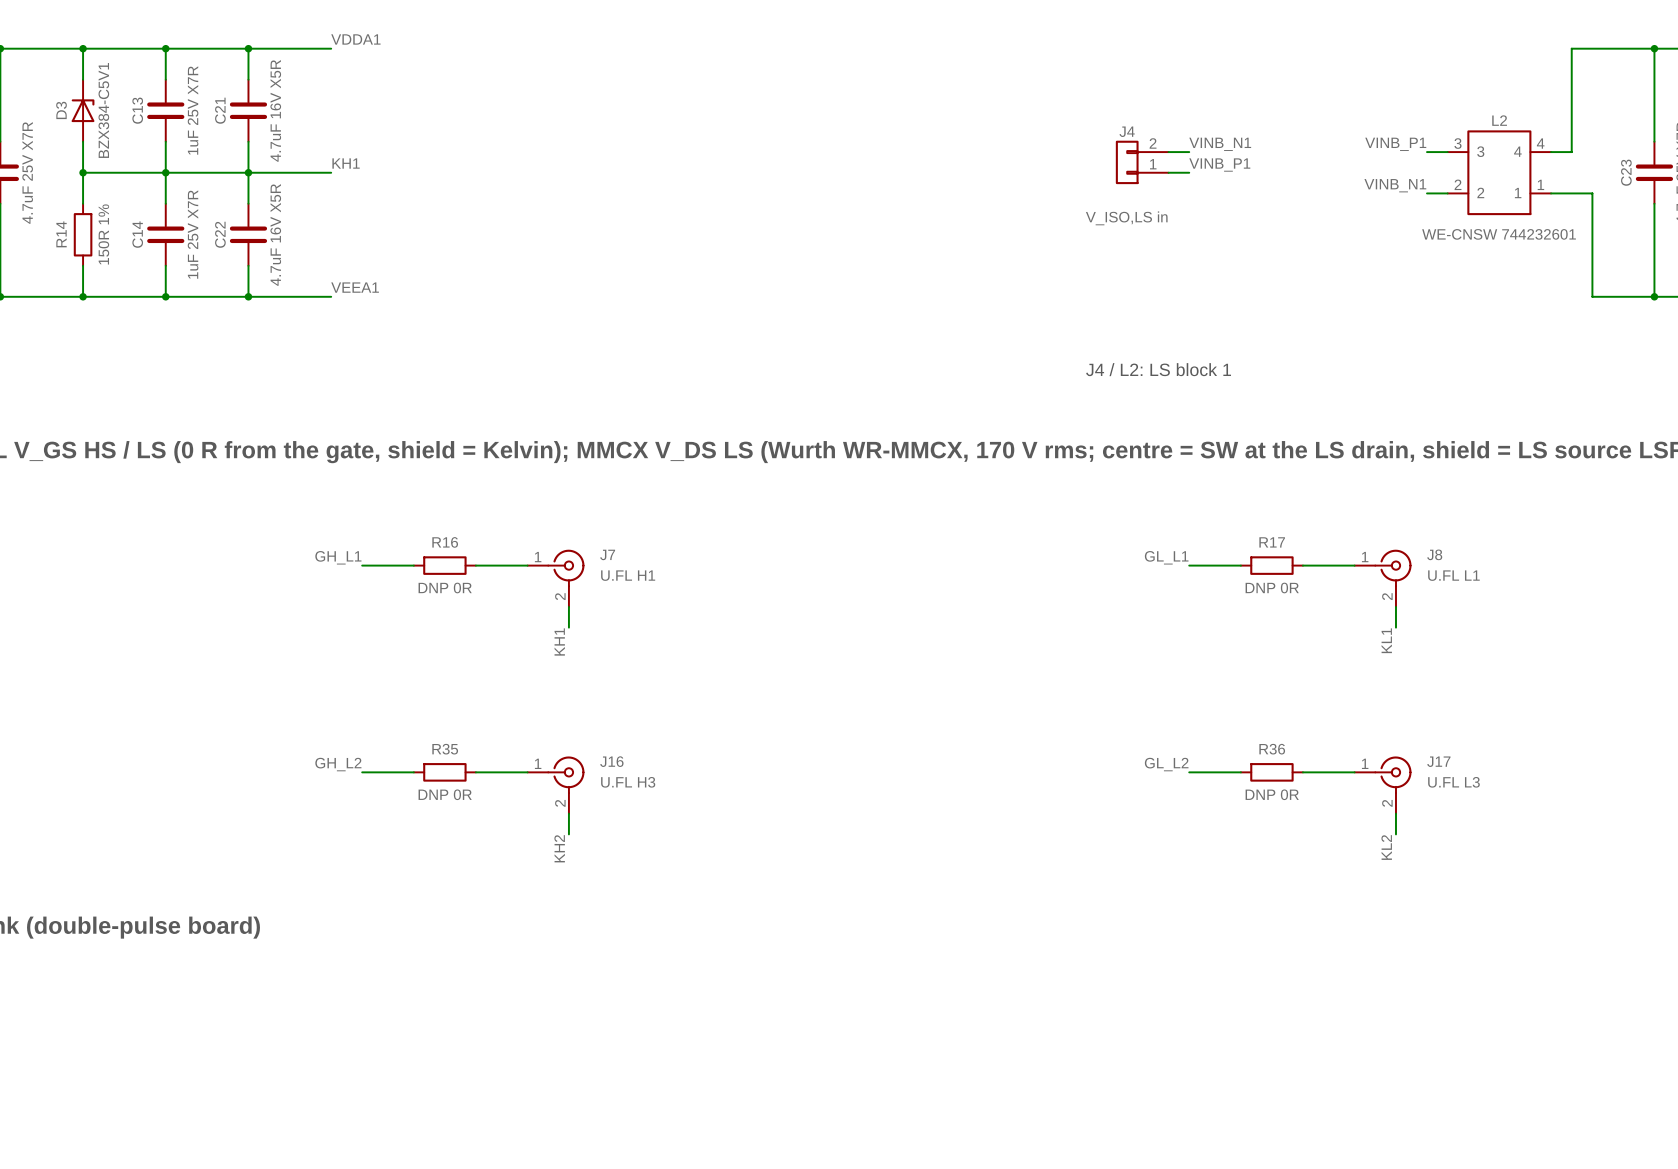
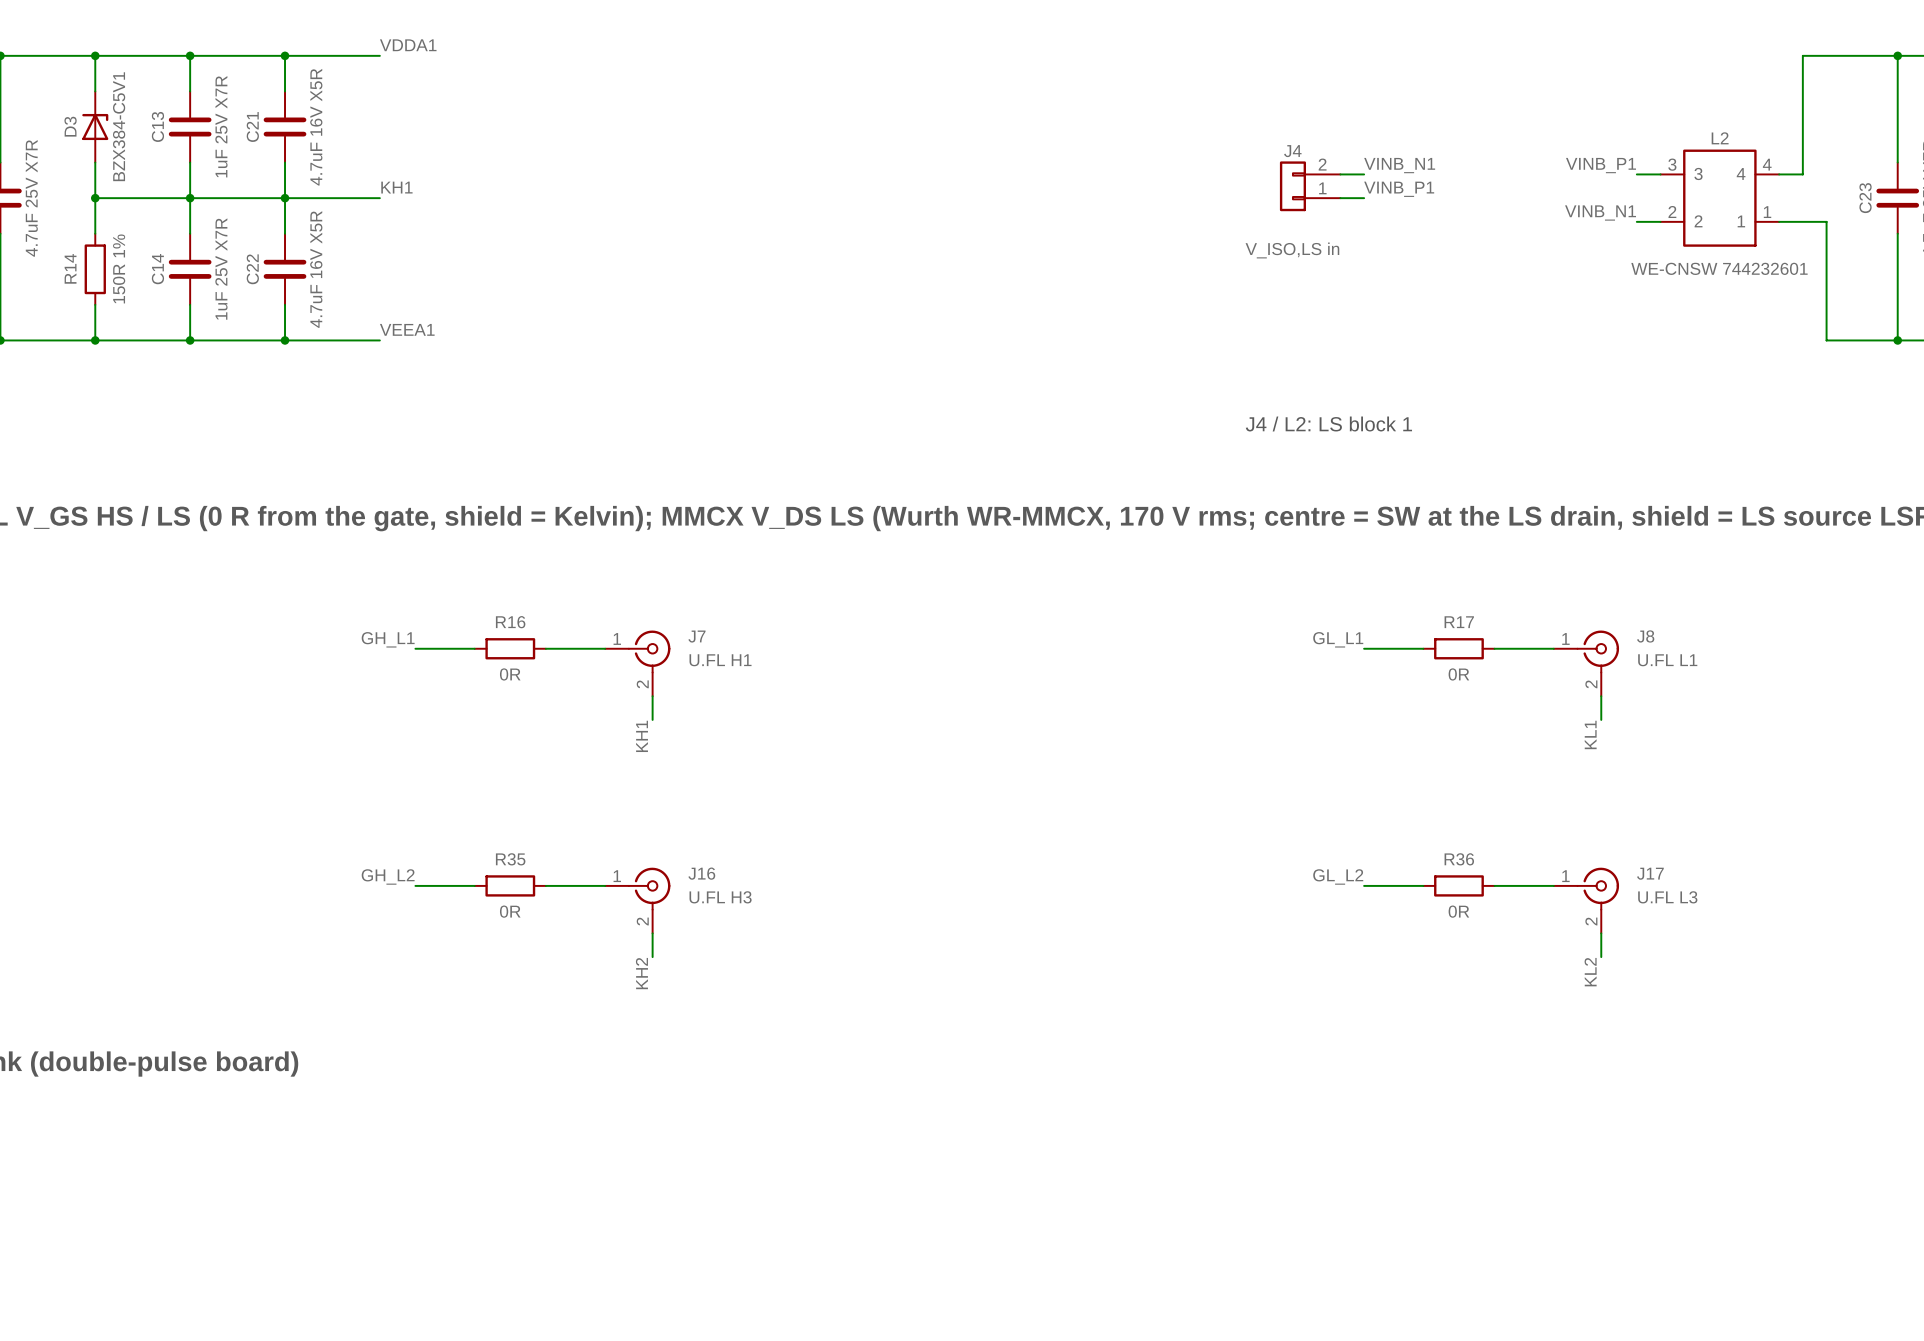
R16 value: DNP 0R (445, 588) -> 0R (510, 674)
R17 value: DNP 0R (1272, 588) -> 0R (1458, 674)
R35 value: DNP 0R (445, 794) -> 0R (510, 911)
R36 value: DNP 0R (1272, 794) -> 0R (1458, 911)

